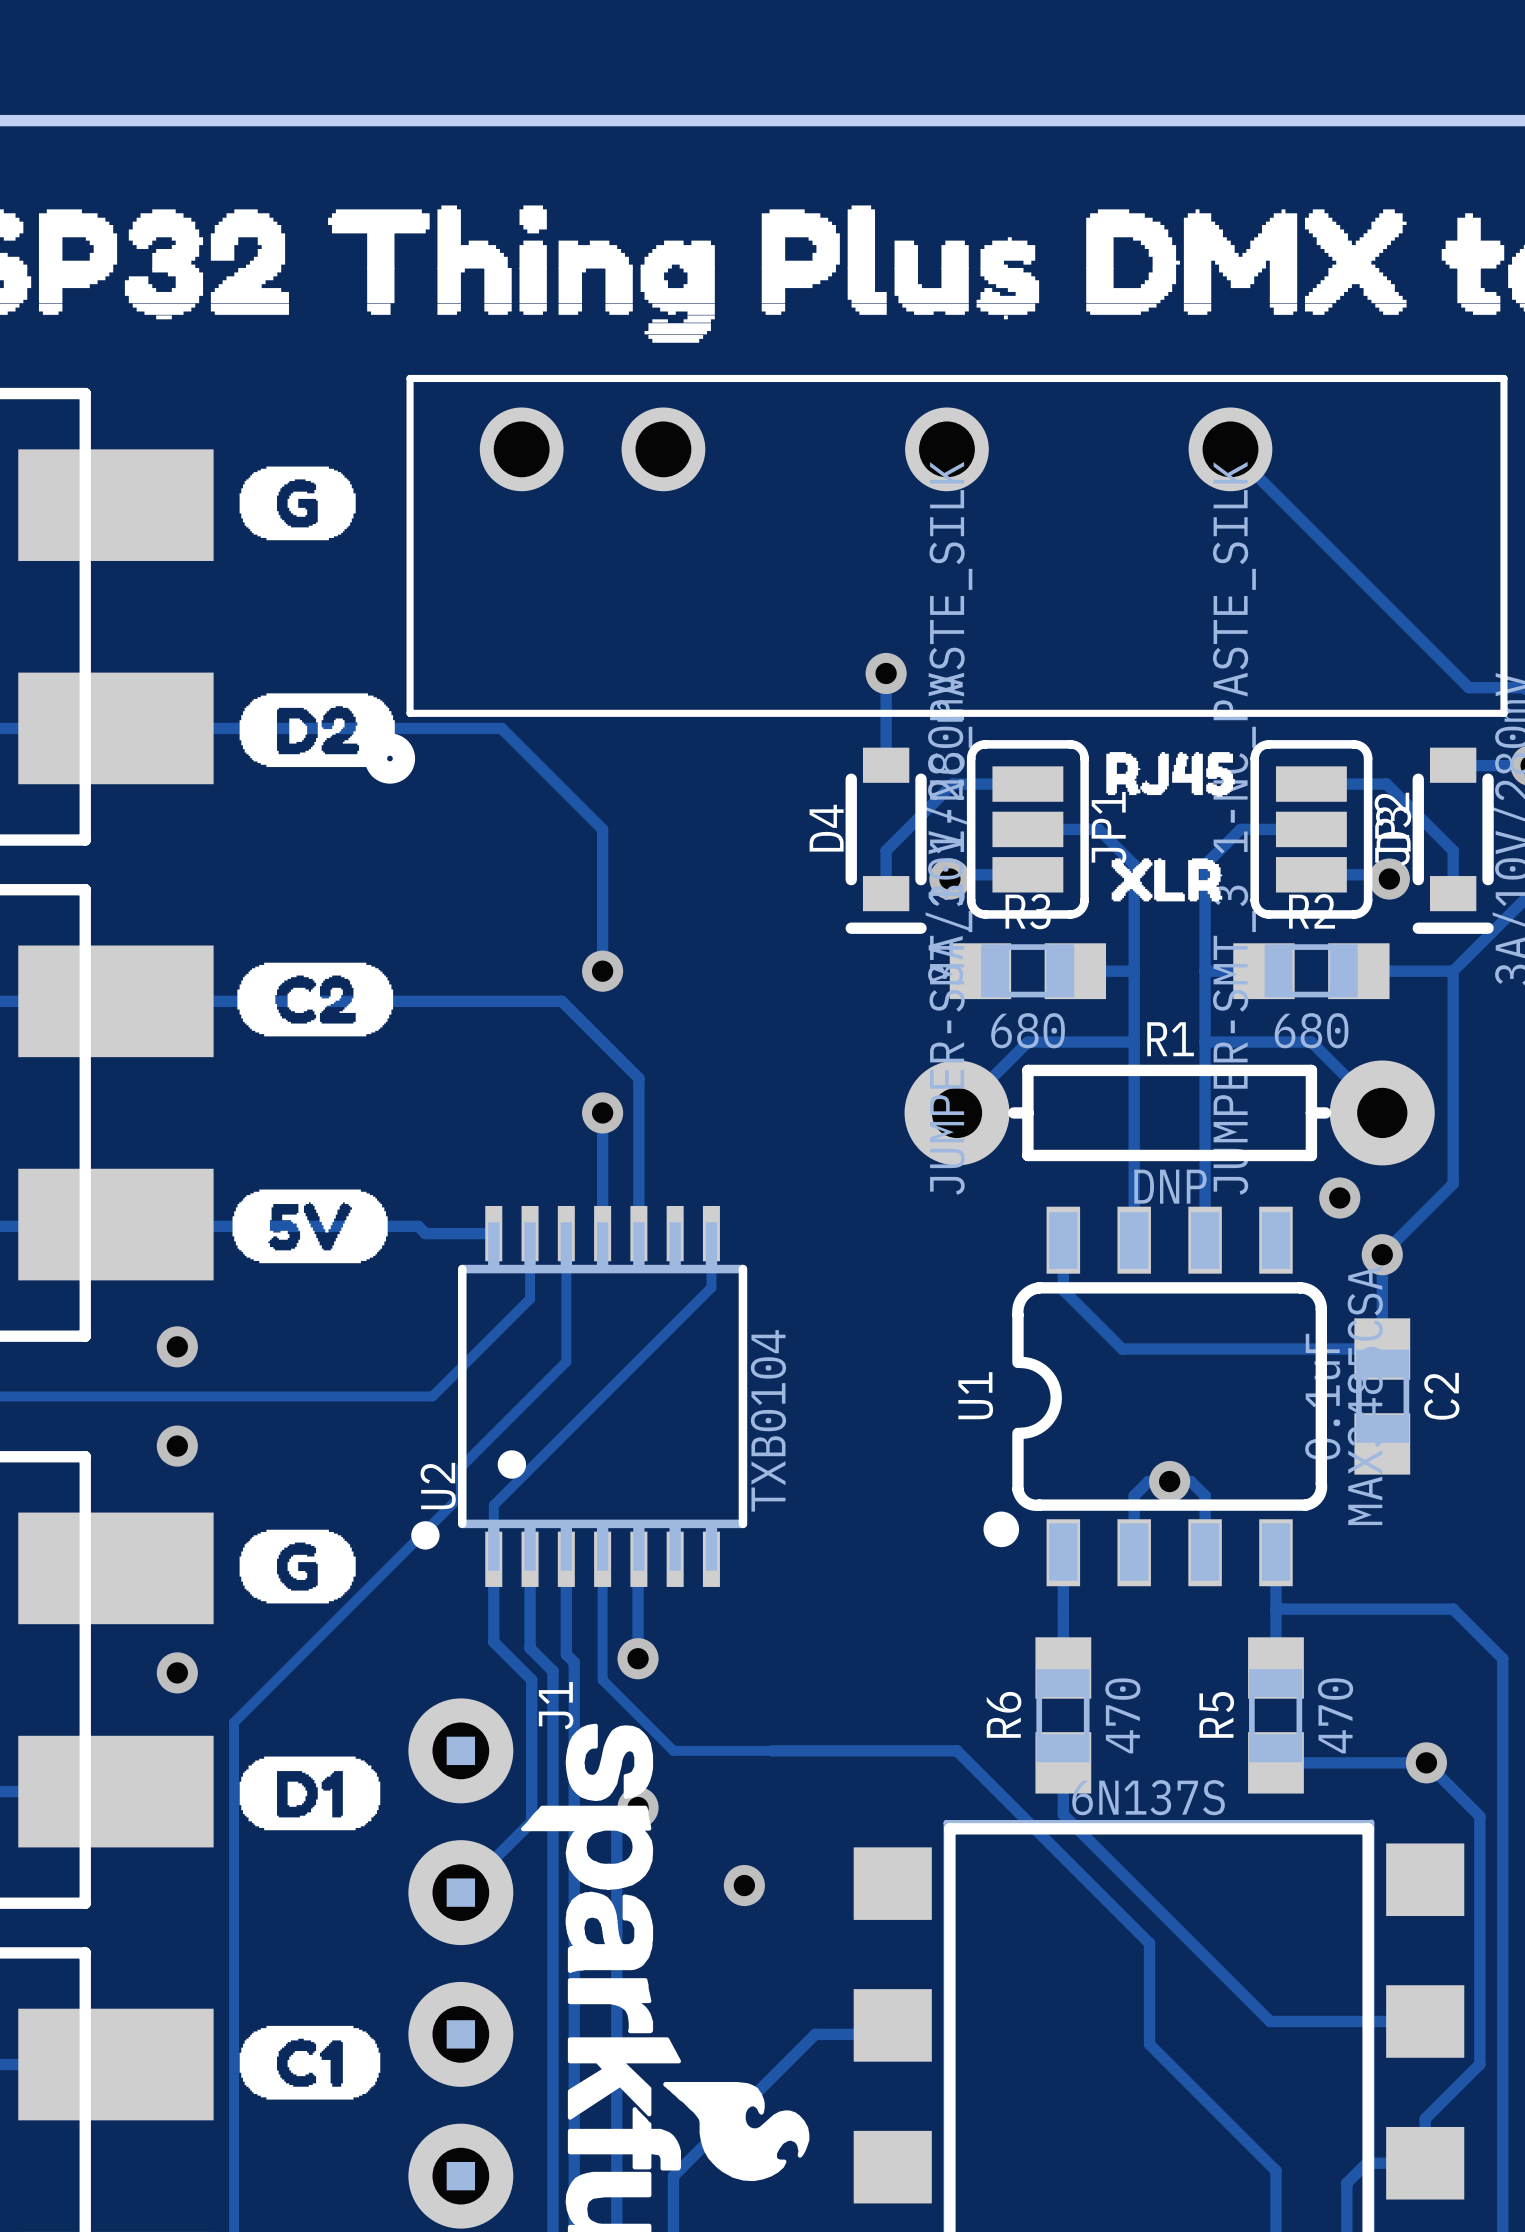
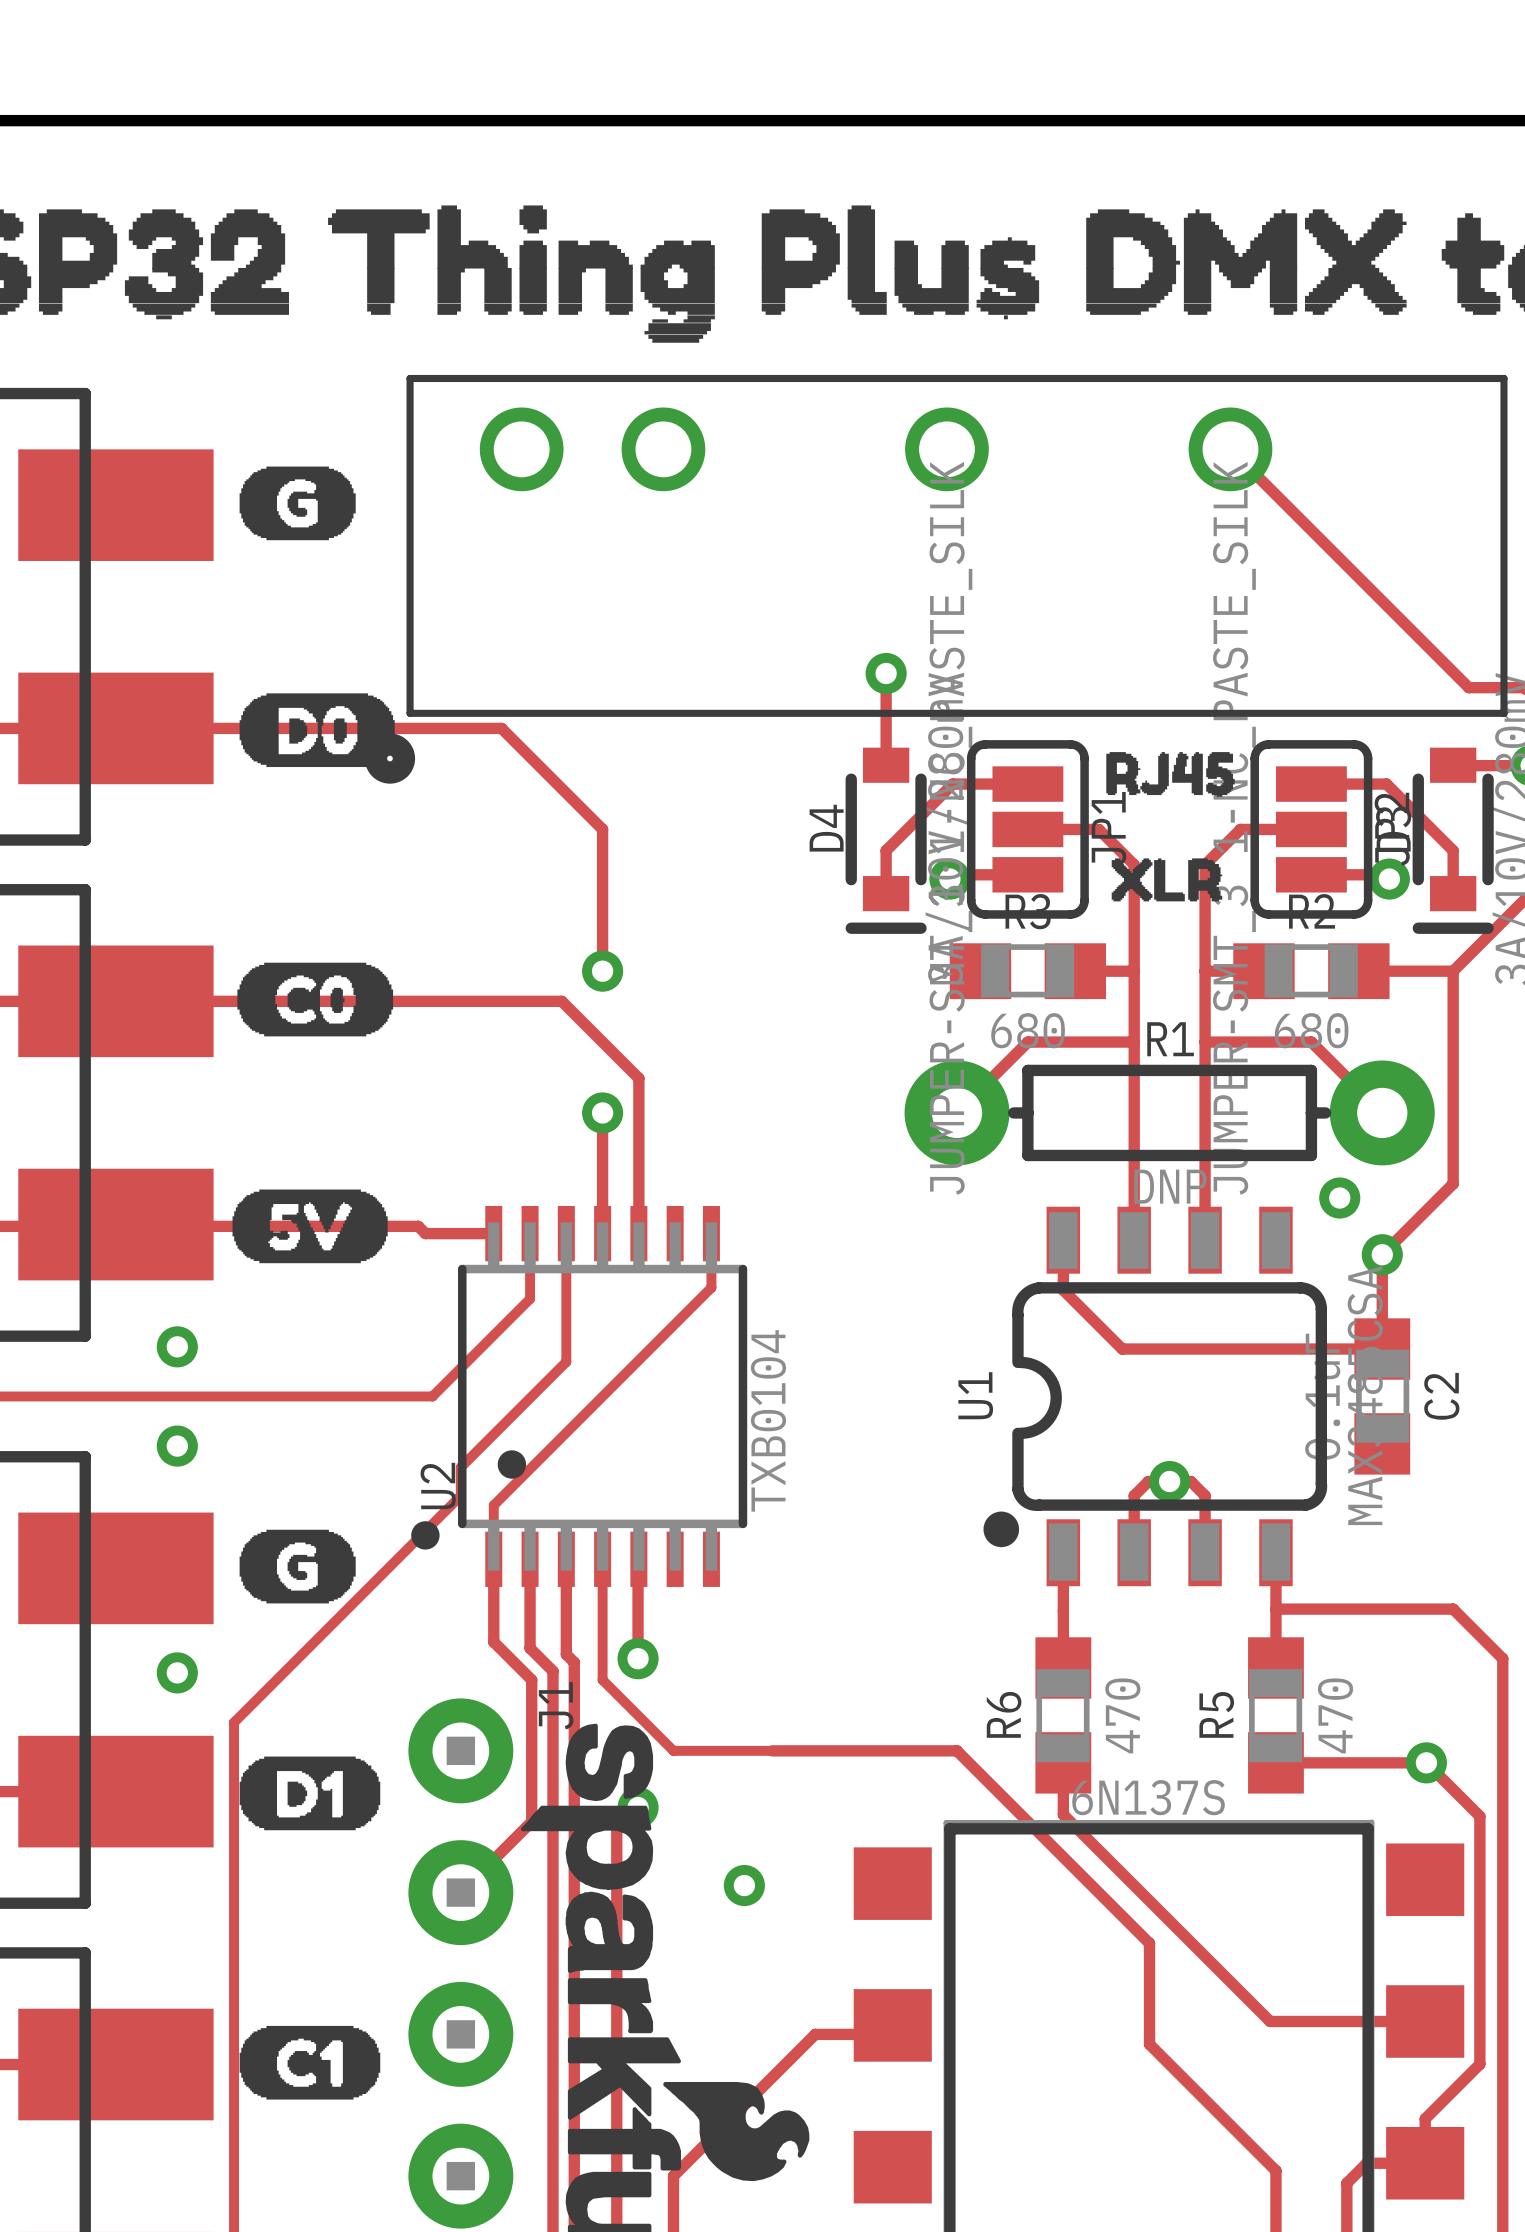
drawing shape: [239, 693, 395, 768] -> [239, 693, 395, 768]
drawing shape: [237, 962, 394, 1037] -> [237, 962, 394, 1037]

